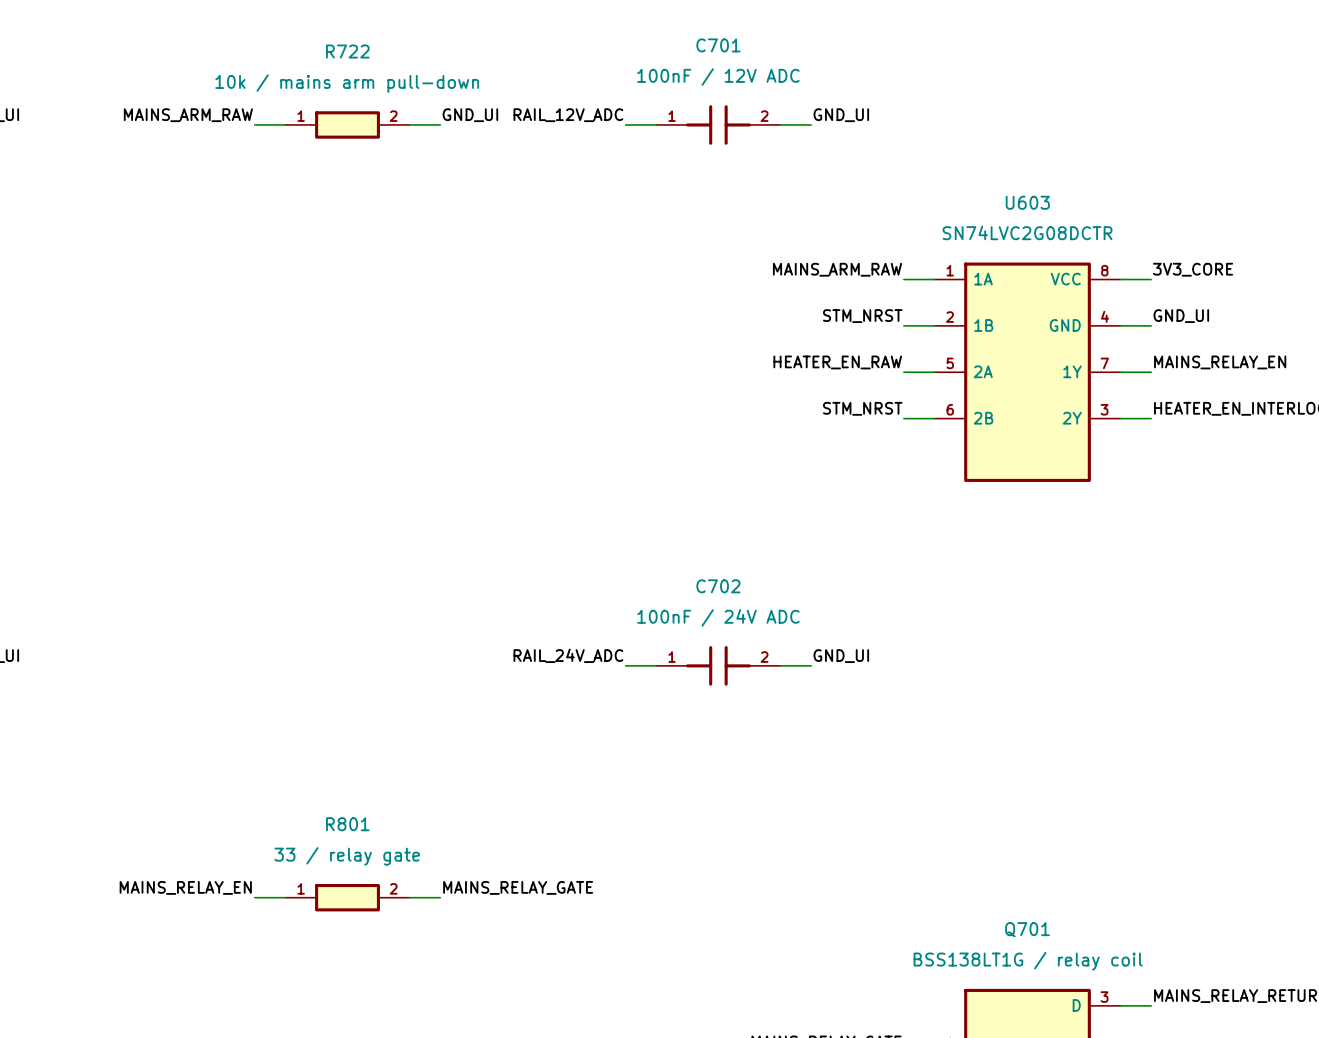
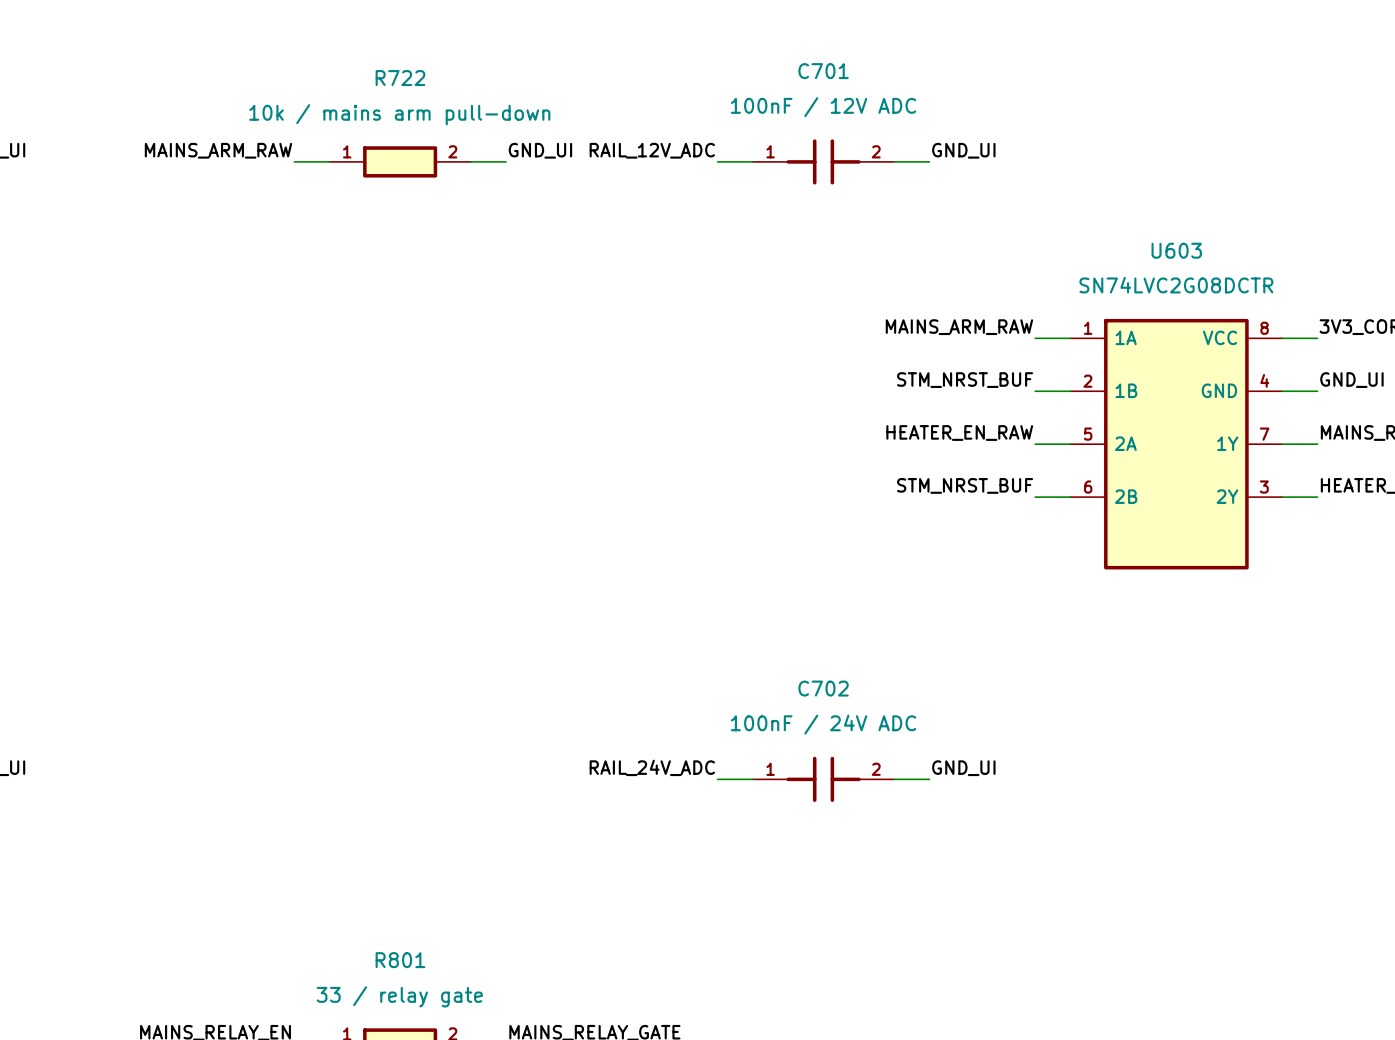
label: STM_NRST (862, 316) -> STM_NRST_BUF (965, 380)
label: STM_NRST (862, 408) -> STM_NRST_BUF (965, 485)

